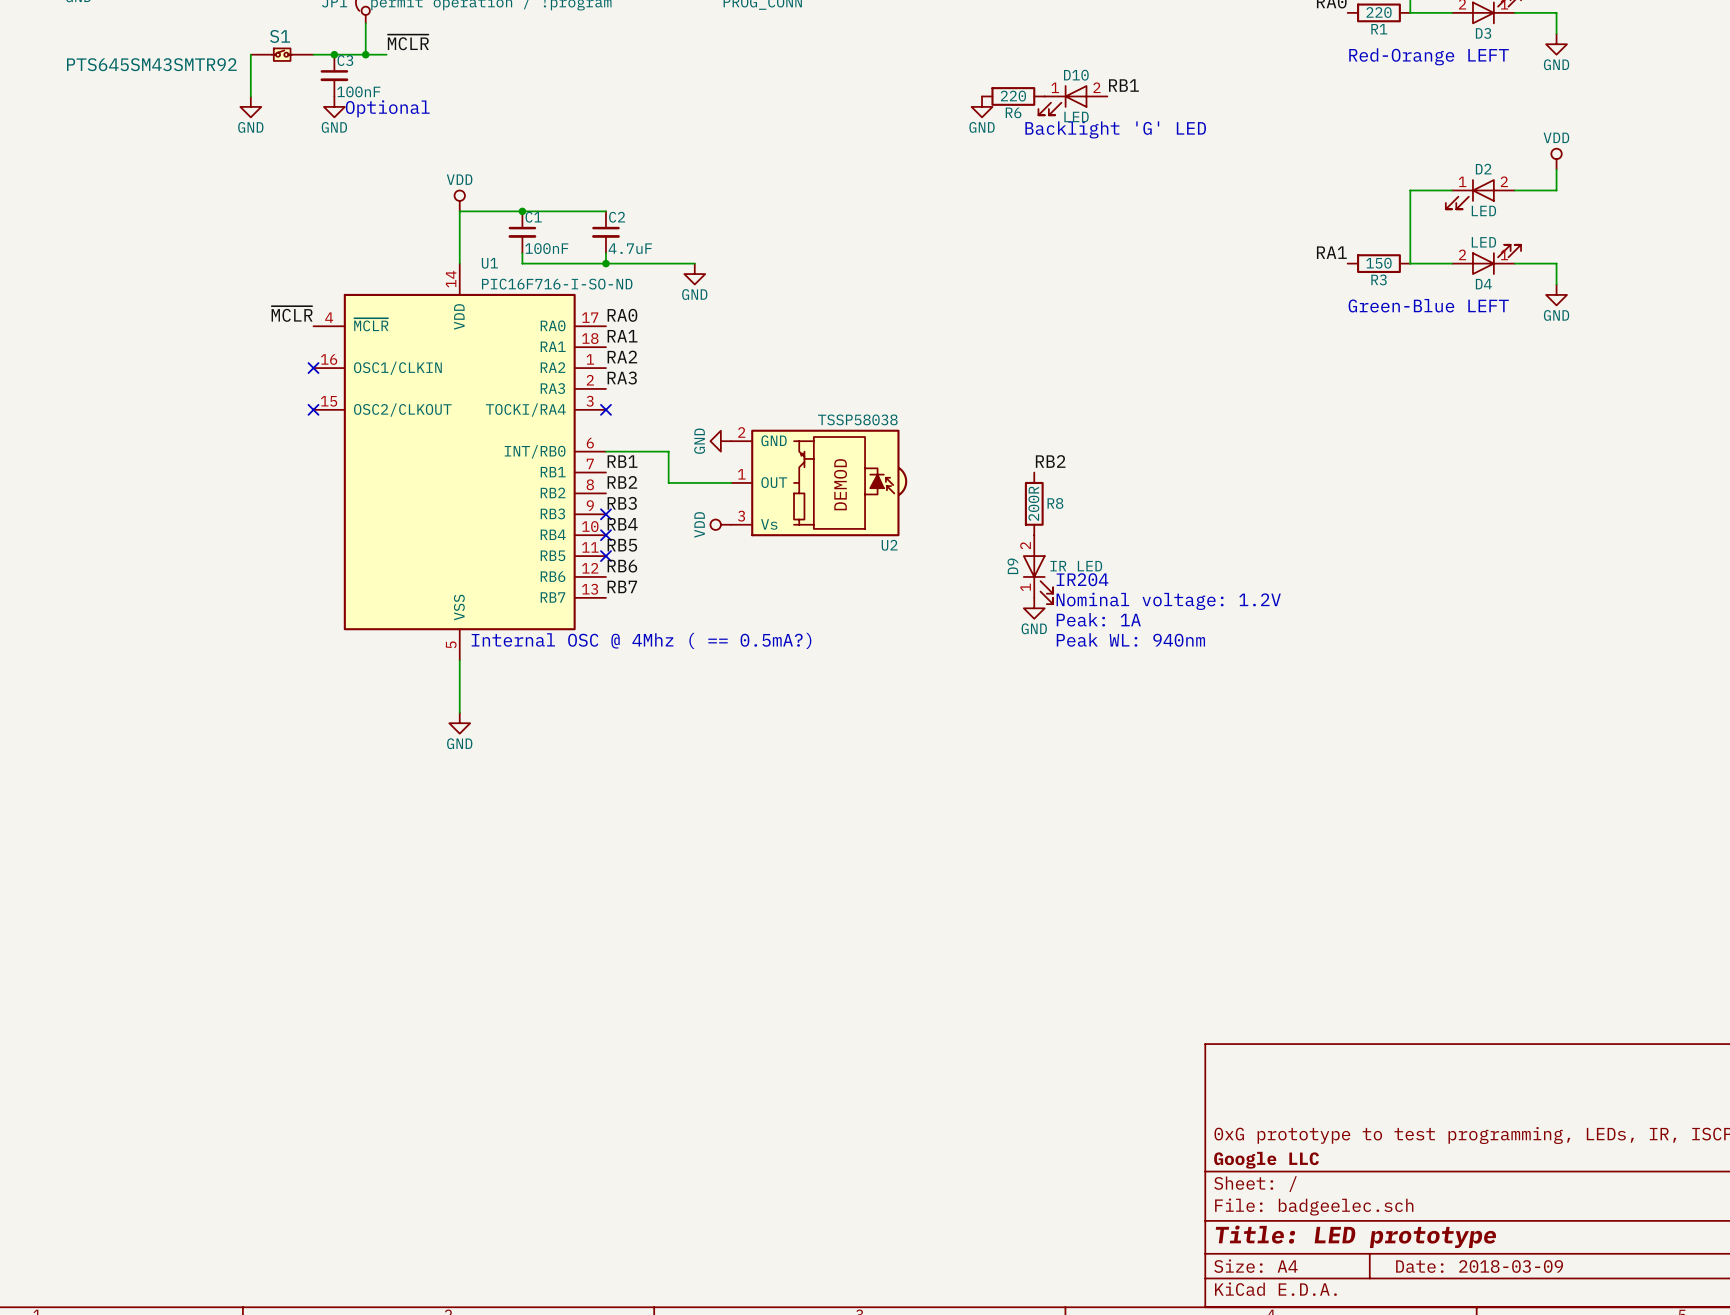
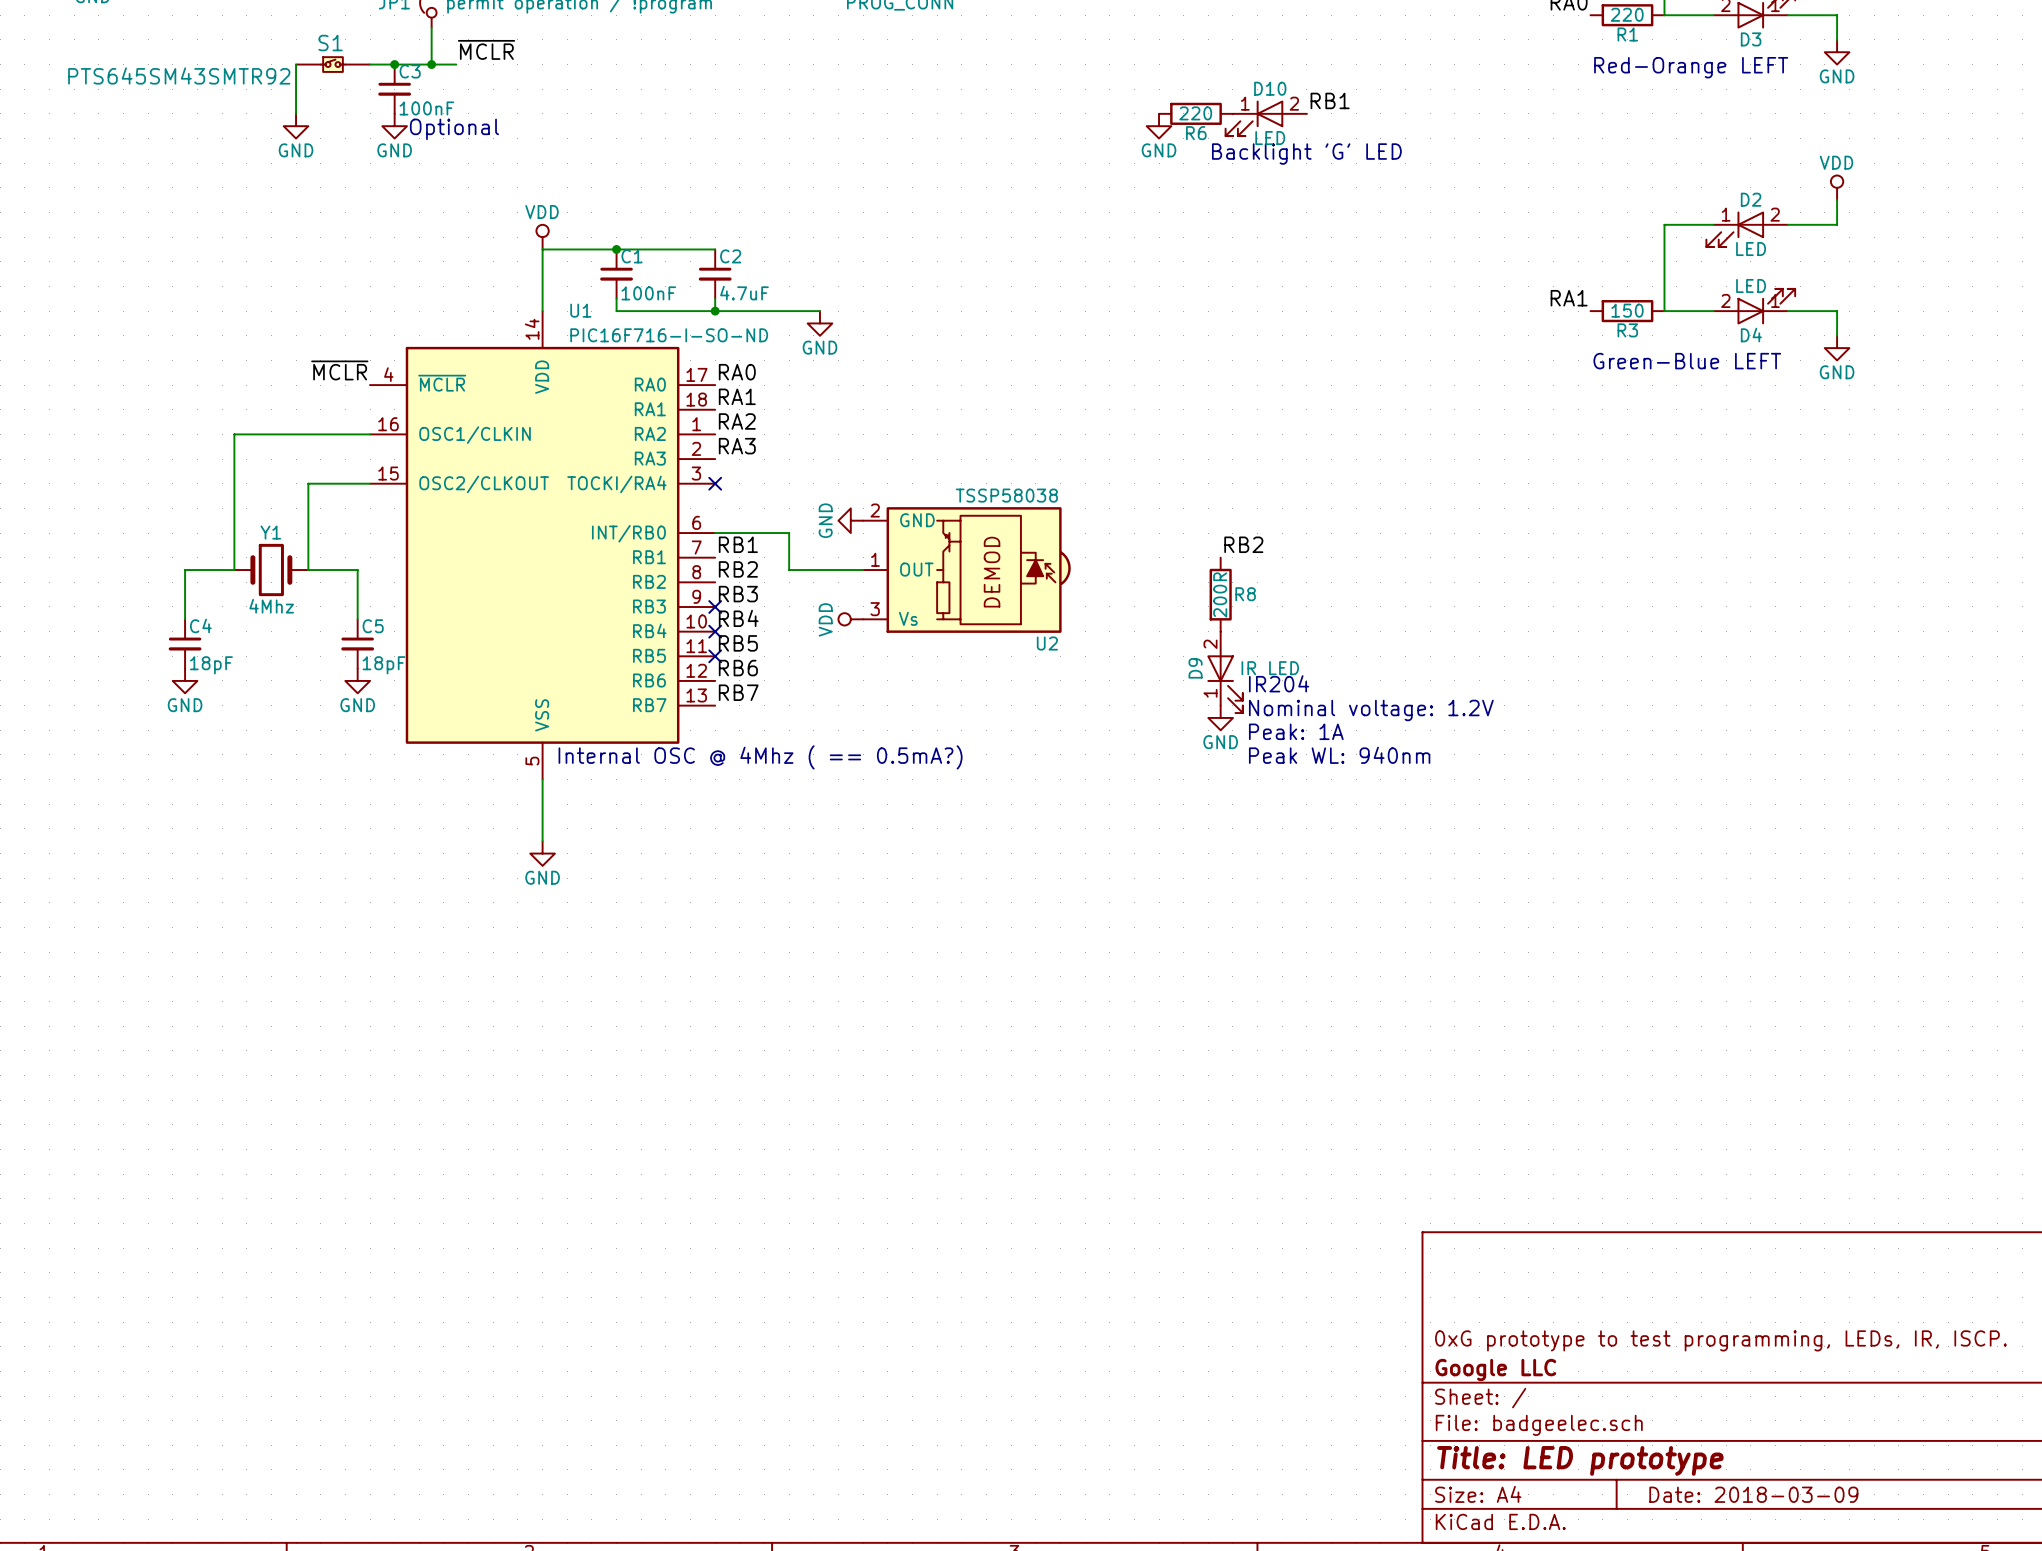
wire: none -> (370, 434) (234, 434) (234, 570) (185, 570) (185, 619)
no-connect mark: (313, 368) -> none
wire: none -> (370, 483) (308, 483) (308, 570) (357, 570) (357, 619)
no-connect mark: (313, 409) -> none
Y1: none -> 4Mhz (271, 570)
C4: none -> 18pF (185, 643)
C5: none -> 18pF (357, 643)
power symbol: none -> GND (185, 680)
power symbol: none -> GND (357, 680)

